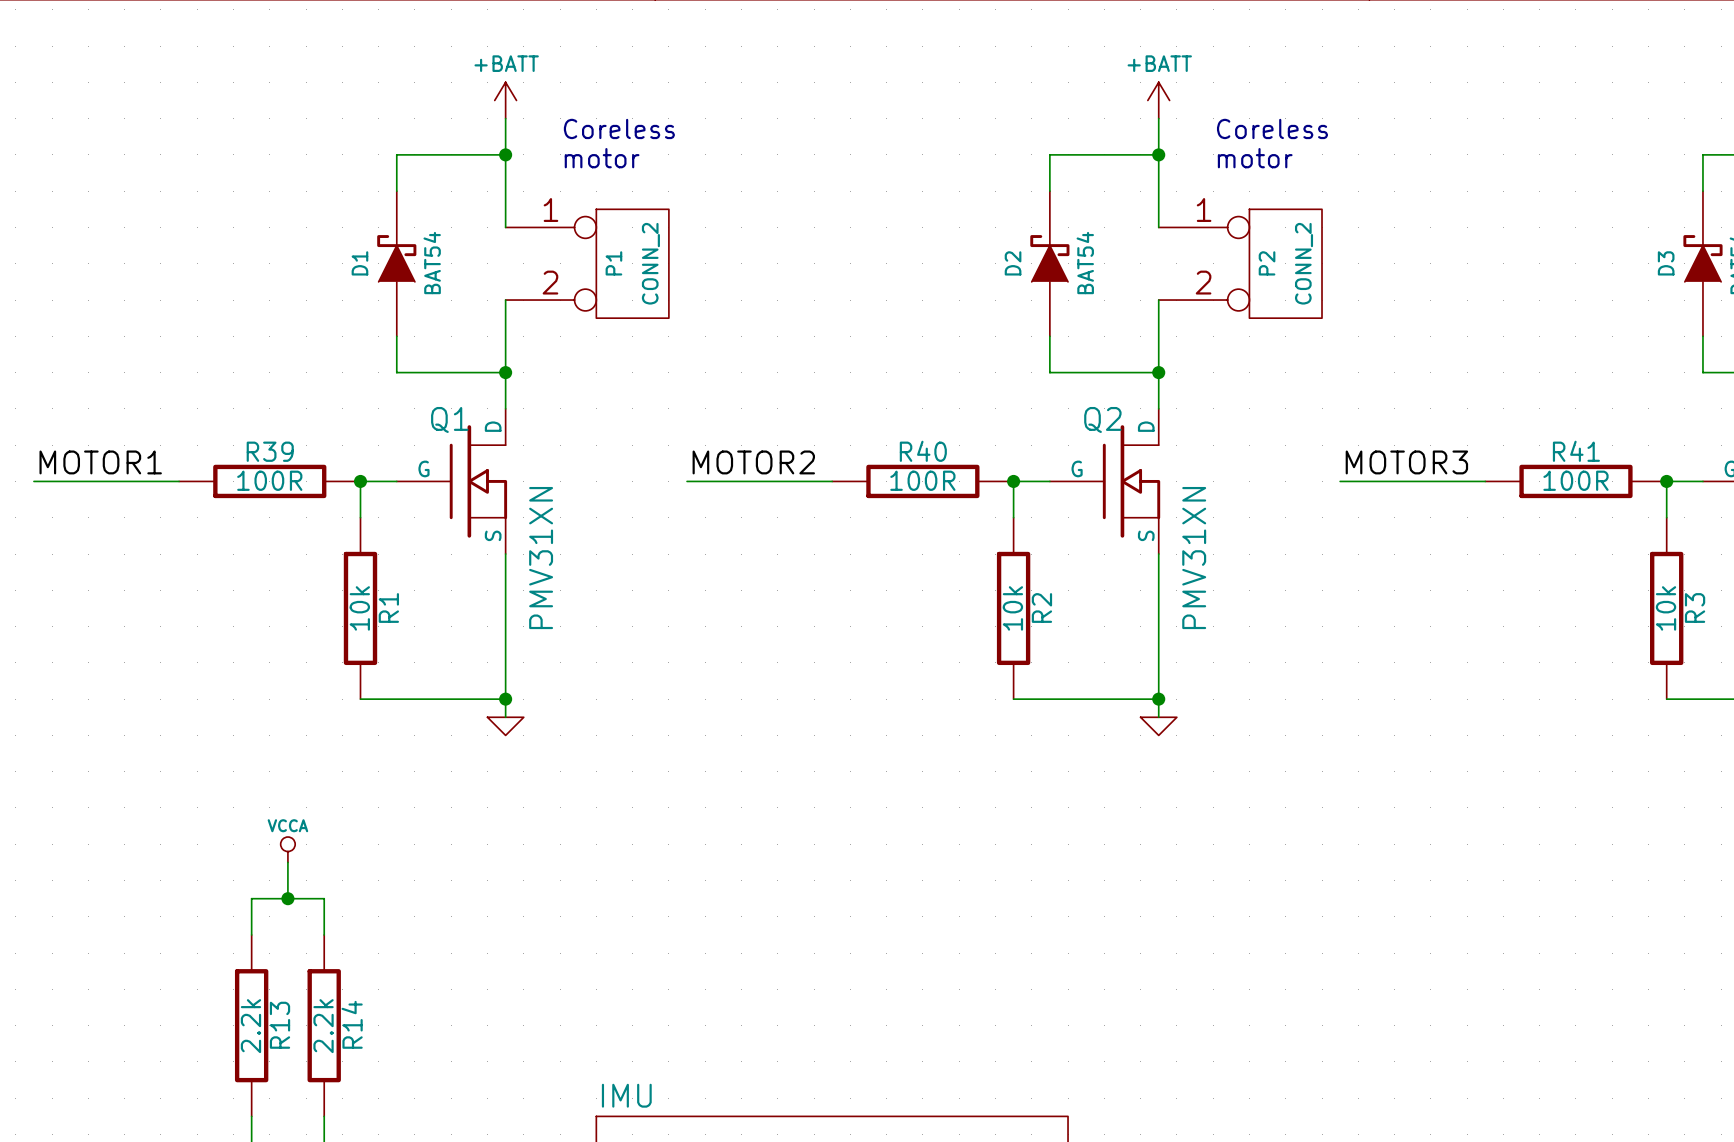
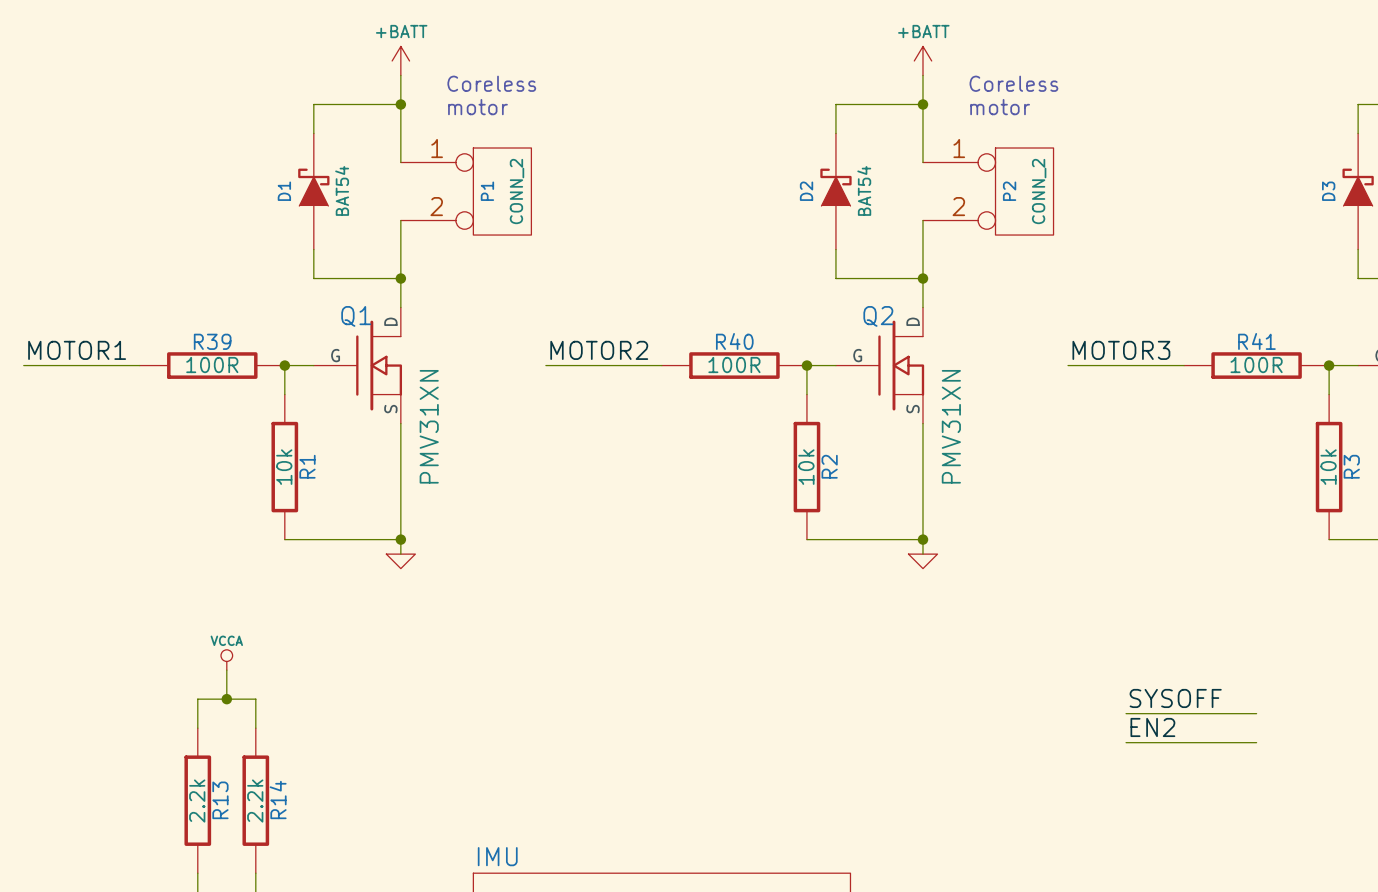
label: none -> SYSOFF (1175, 698)
wire: none -> (1126, 713) (1256, 713)
label: none -> EN2 (1152, 727)
wire: none -> (1126, 742) (1256, 742)

